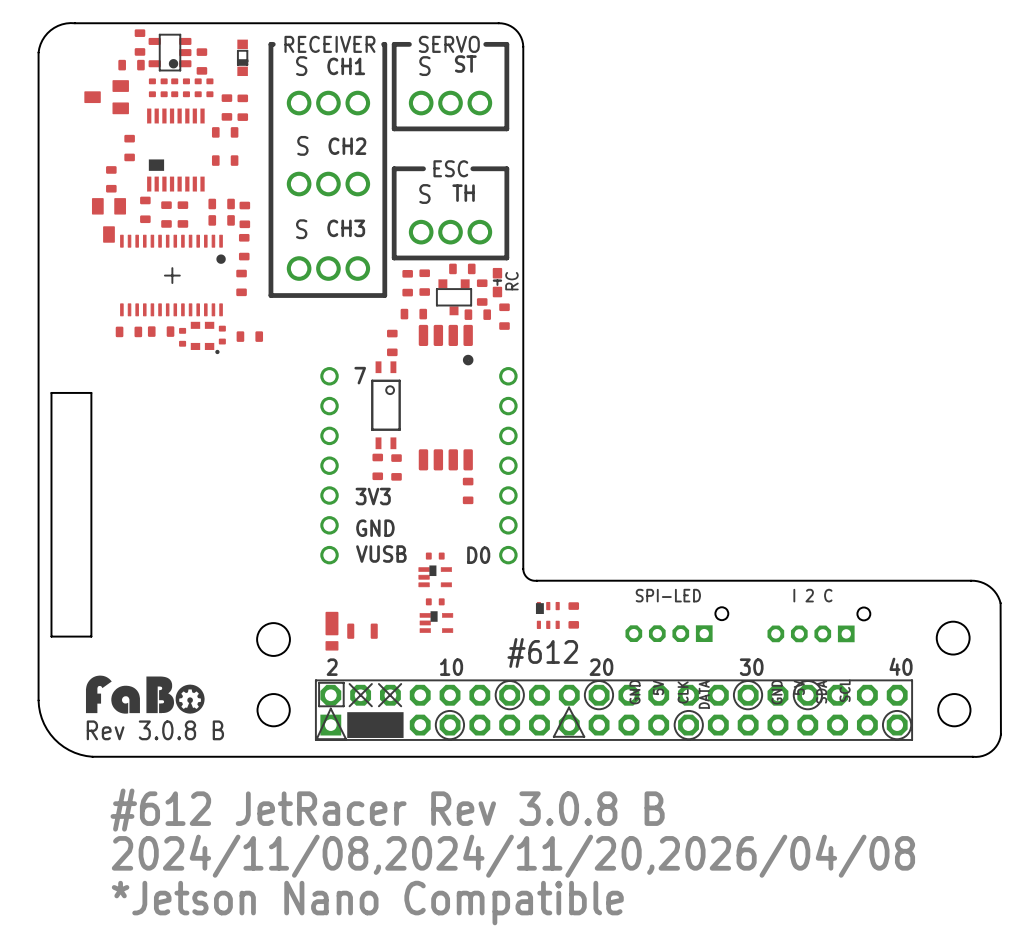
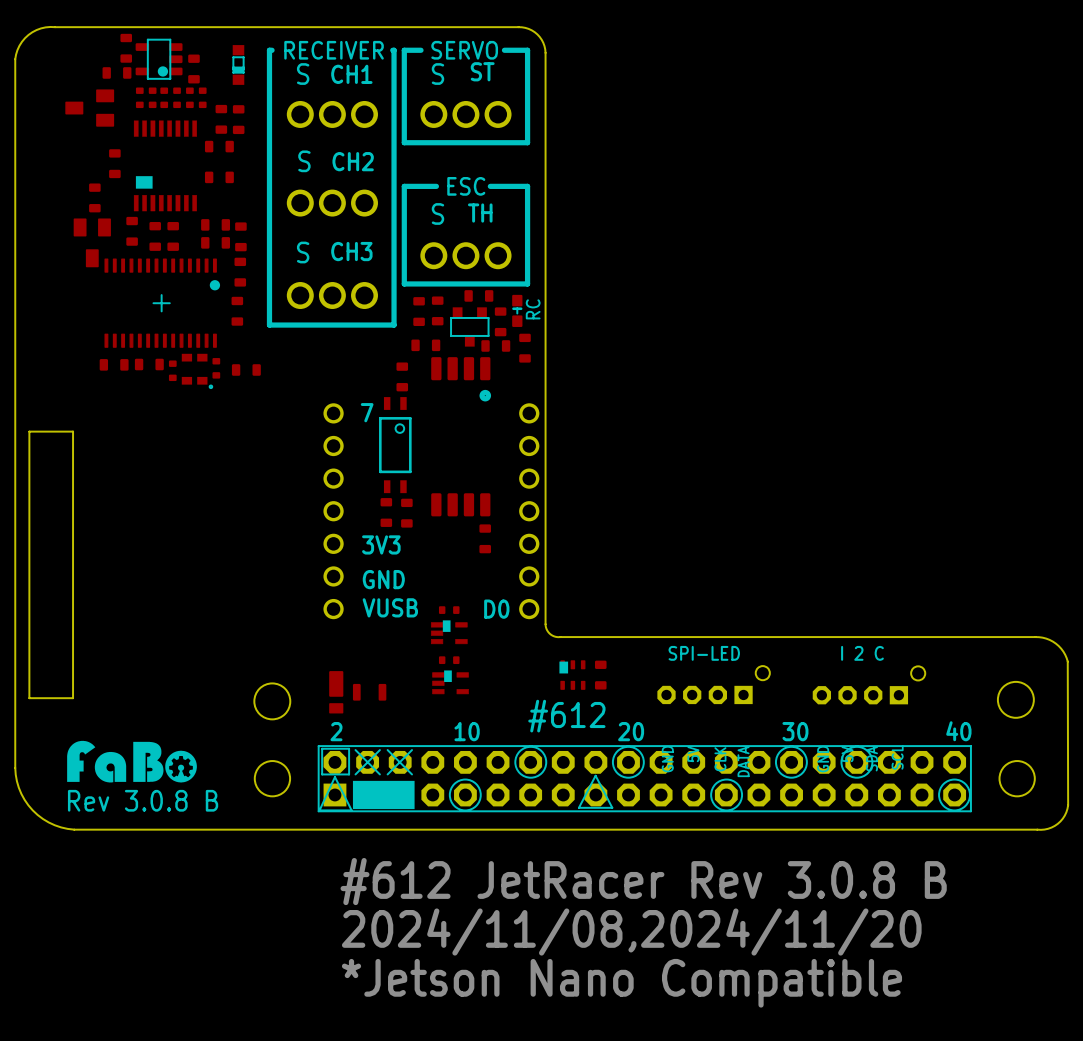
text position: #612 JetRacer Rev 3.0.8 B (387, 810) -> #612 JetRacer Rev 3.0.8 B (643, 881)
text: 2024/11/08,2024/11/20,2026/04/08 (513, 856) -> 2024/11/08,2024/11/20 (631, 932)
text position: *Jetson Nano Compatible (367, 903) -> *Jetson Nano Compatible (621, 983)

